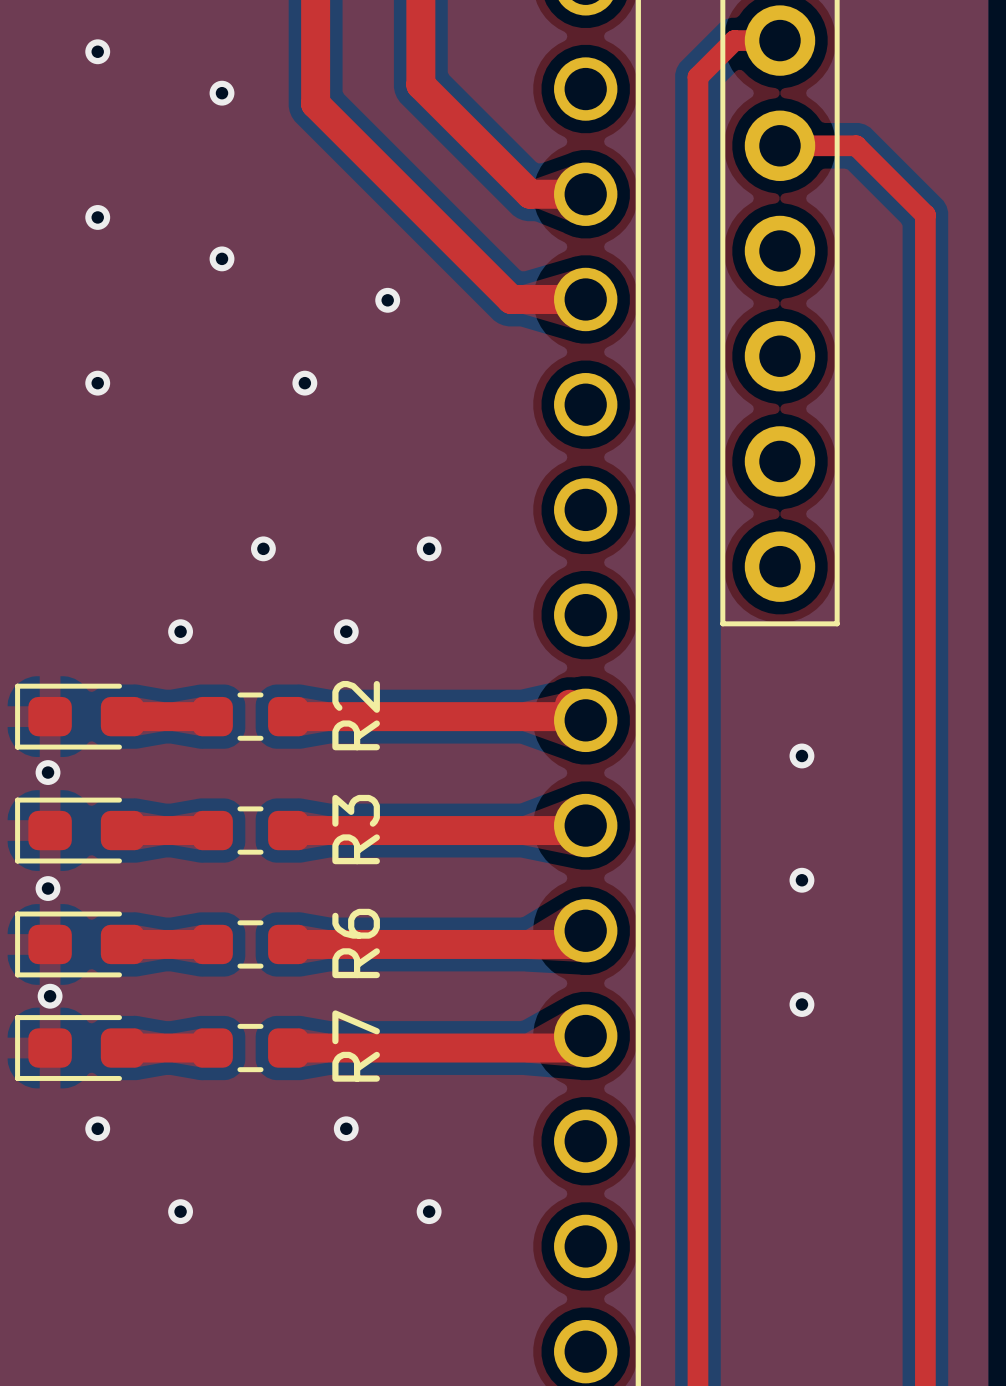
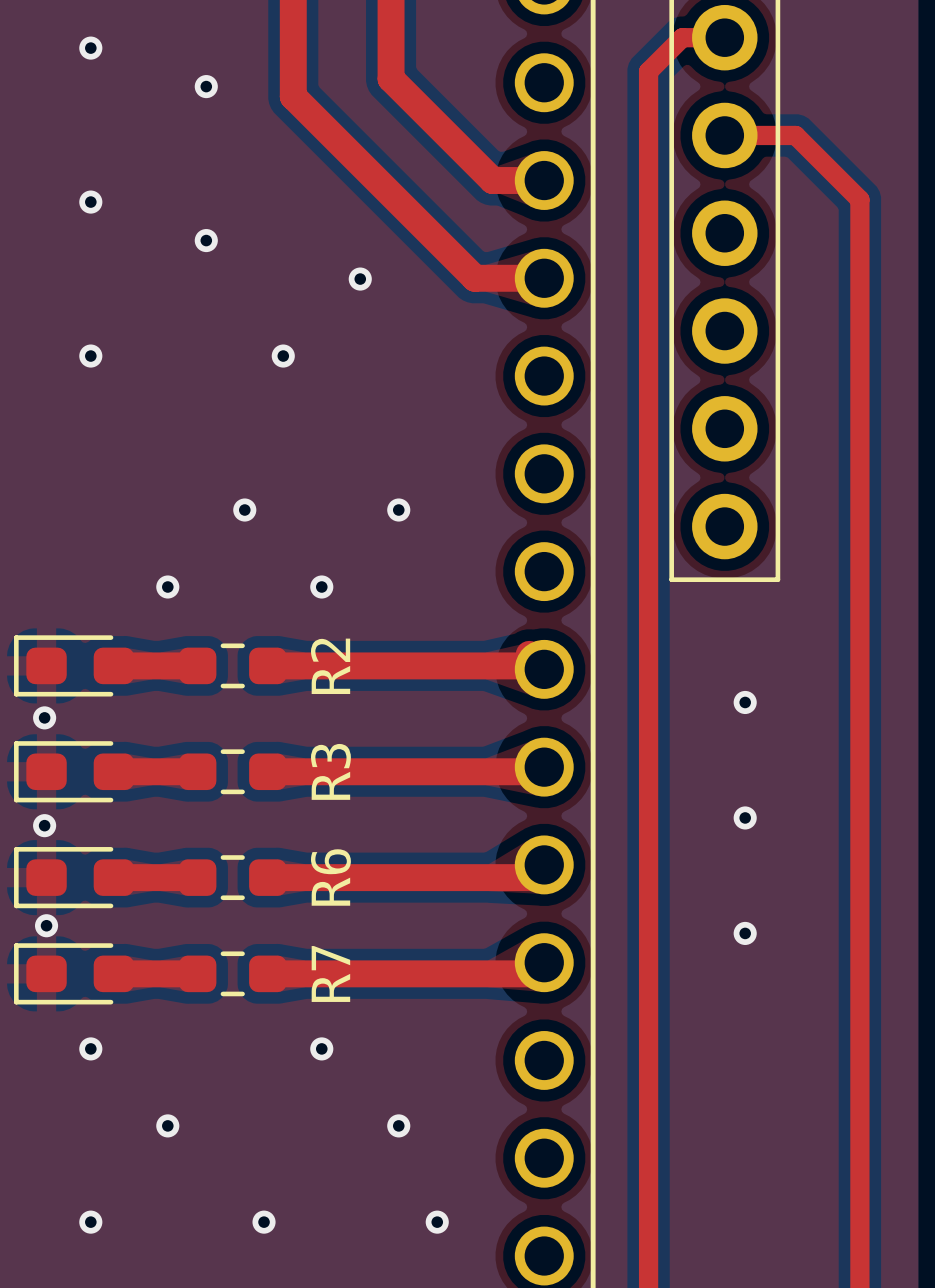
via: none -> (90, 1222)
via: none -> (264, 1222)
via: none -> (437, 1222)

